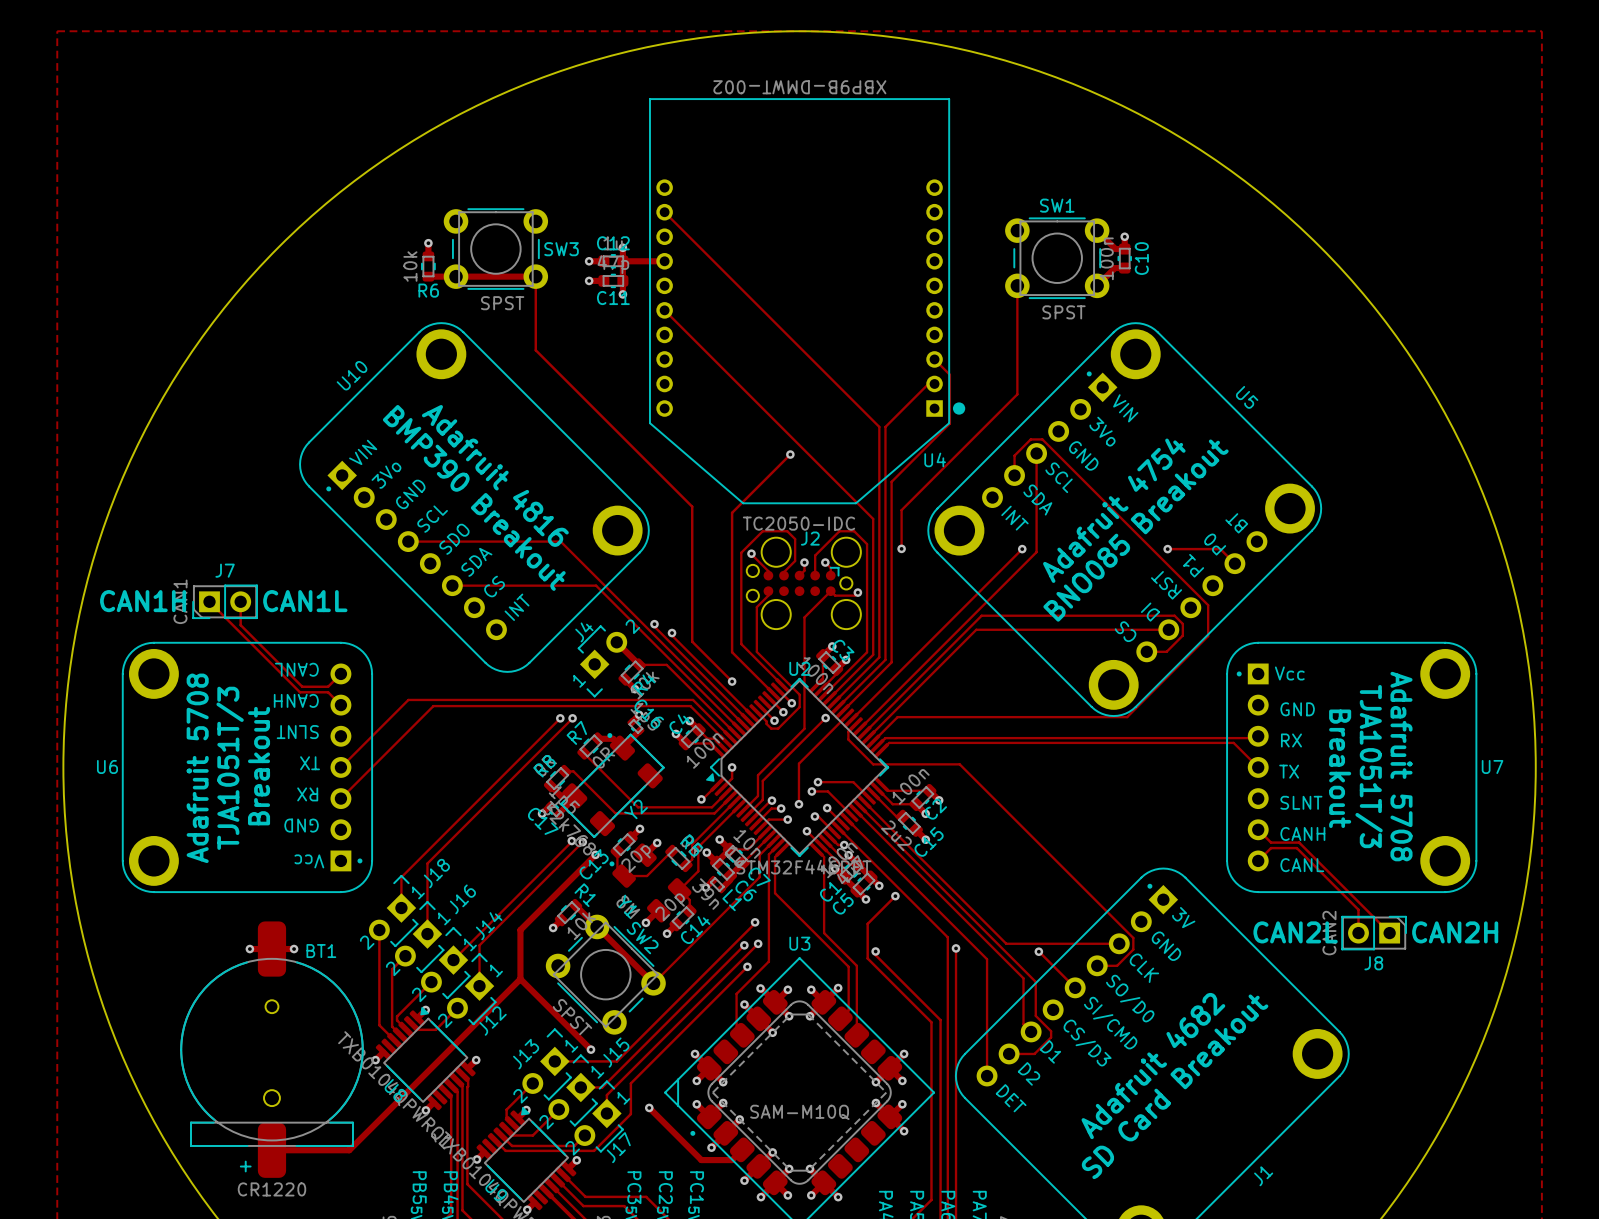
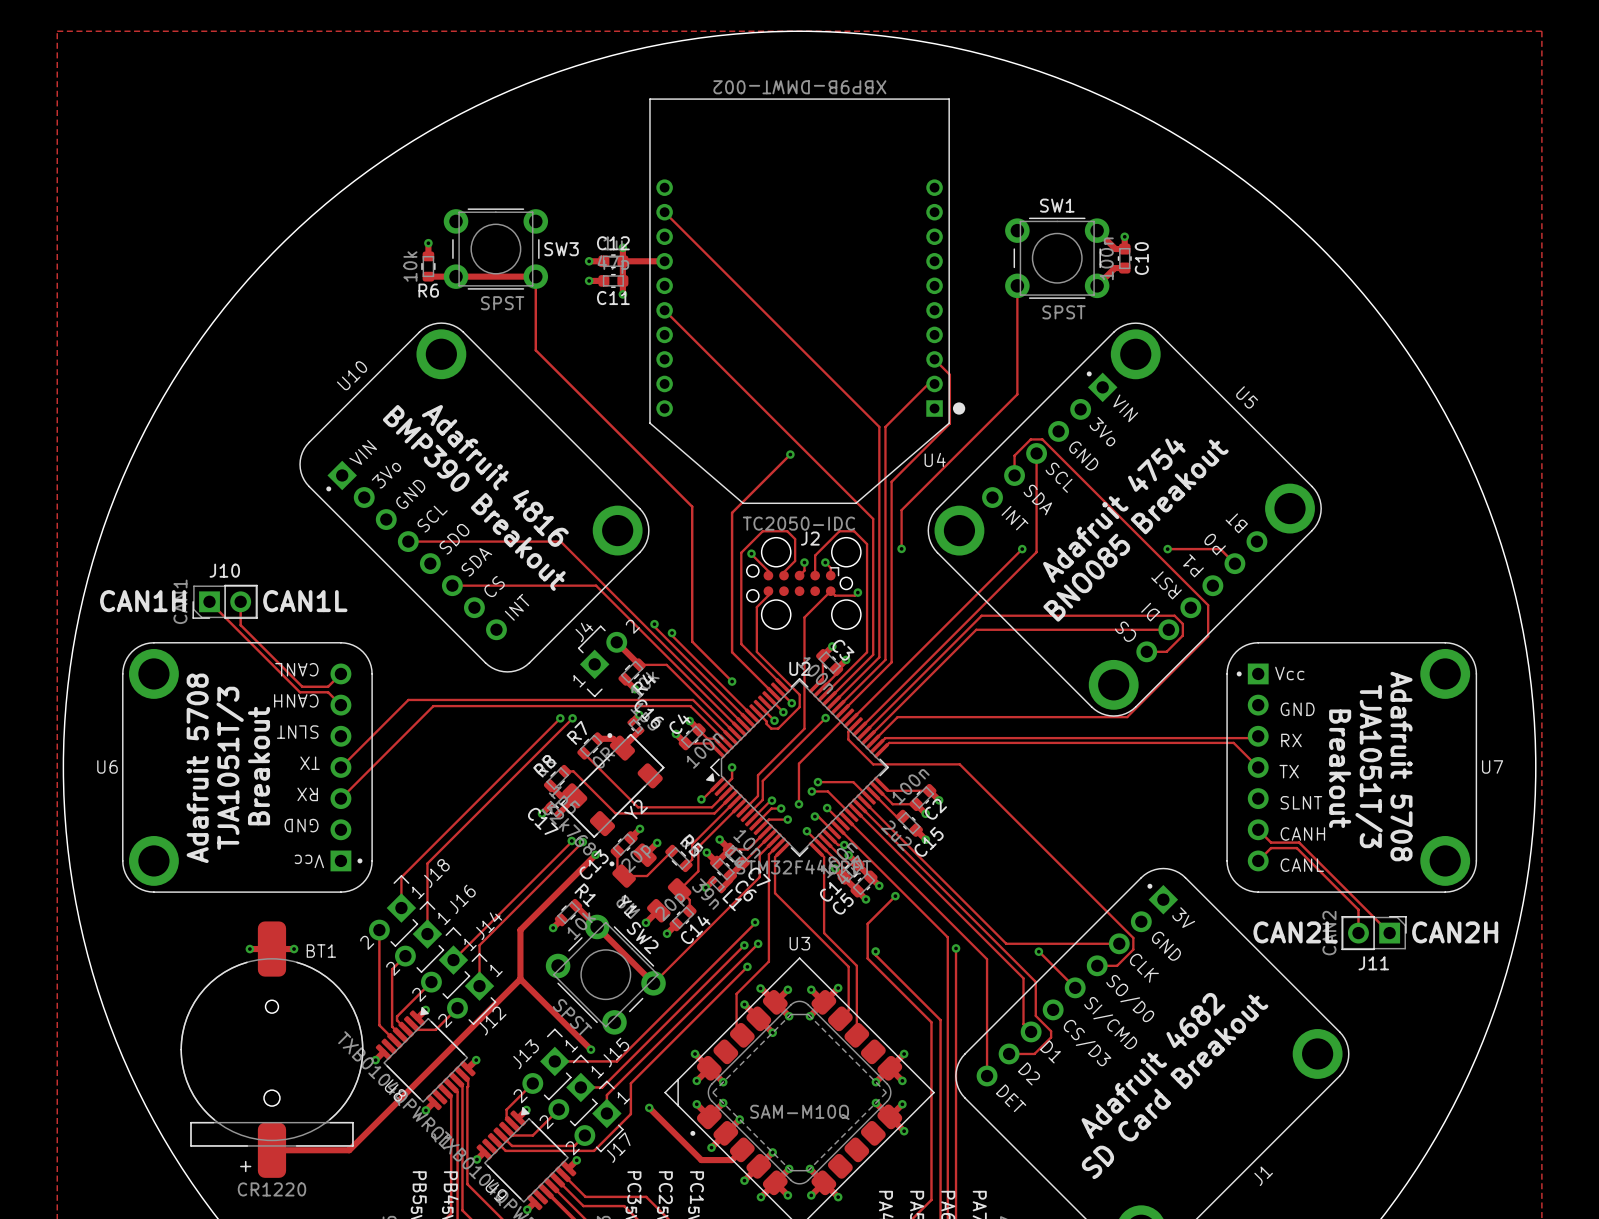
J7 name: J7 (225, 570) -> J10 (224, 570)
J8 name: J8 (1373, 963) -> J11 (1373, 963)

